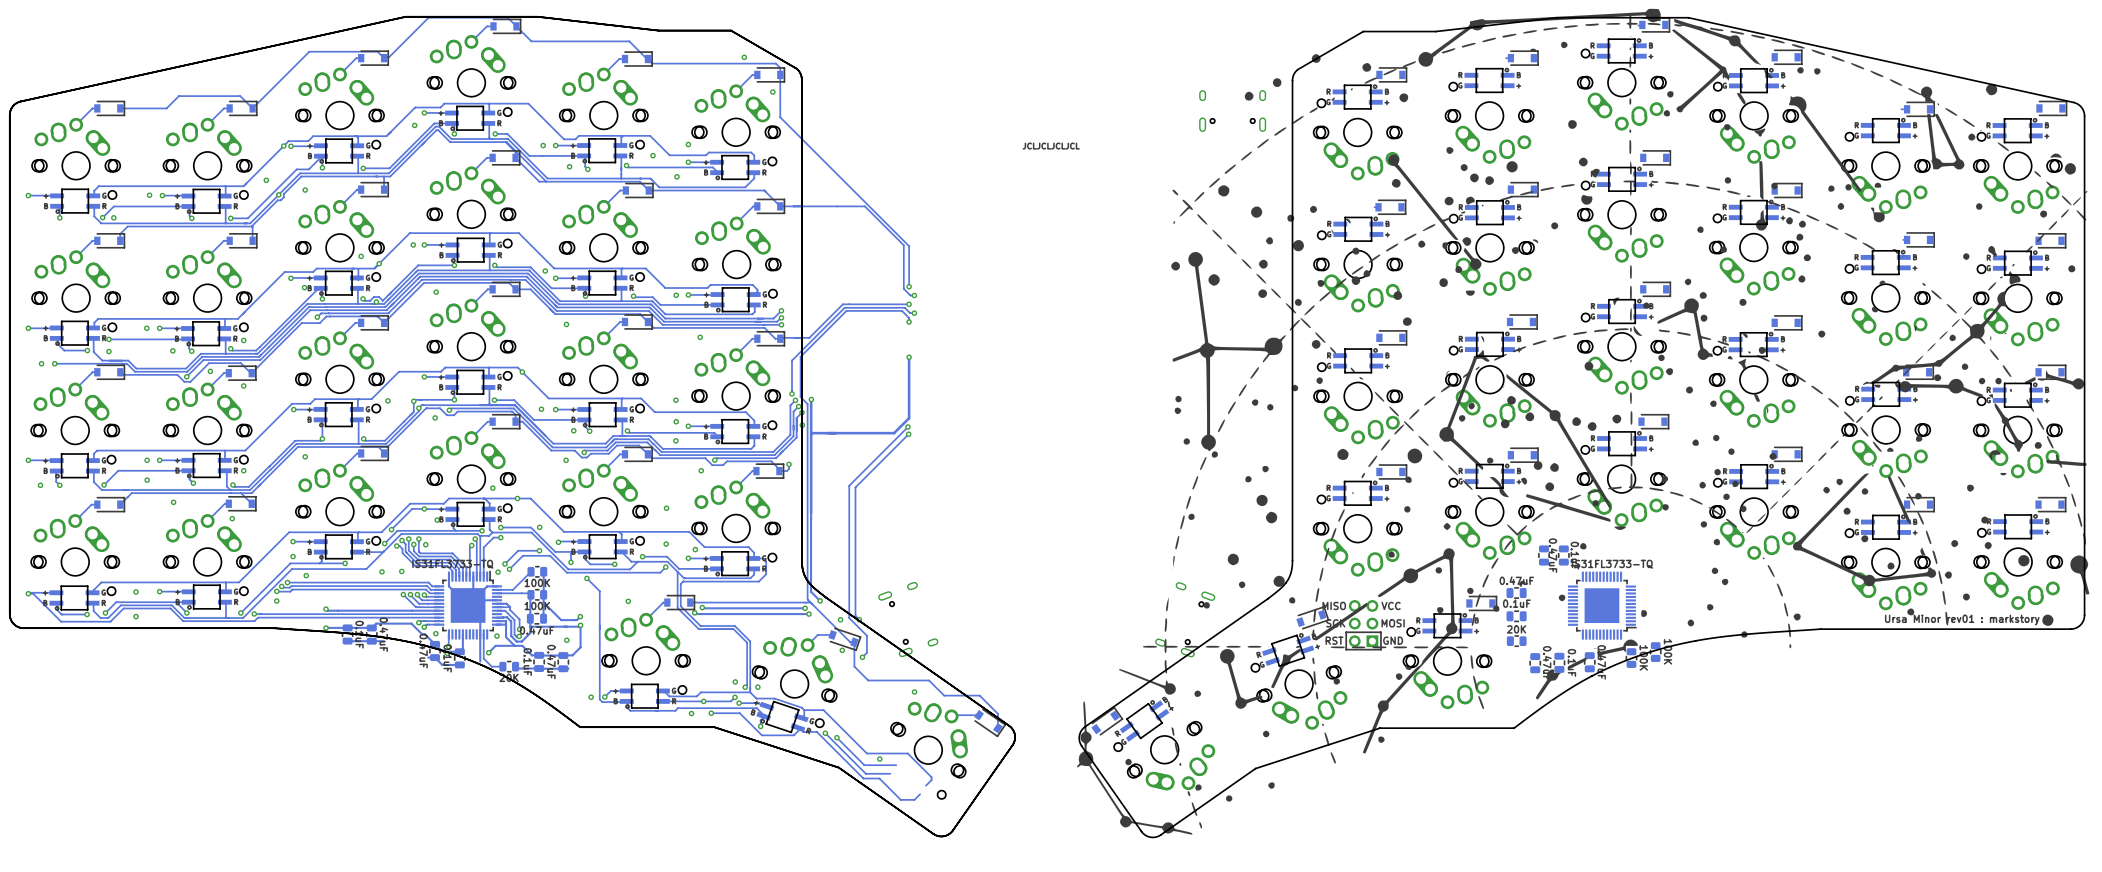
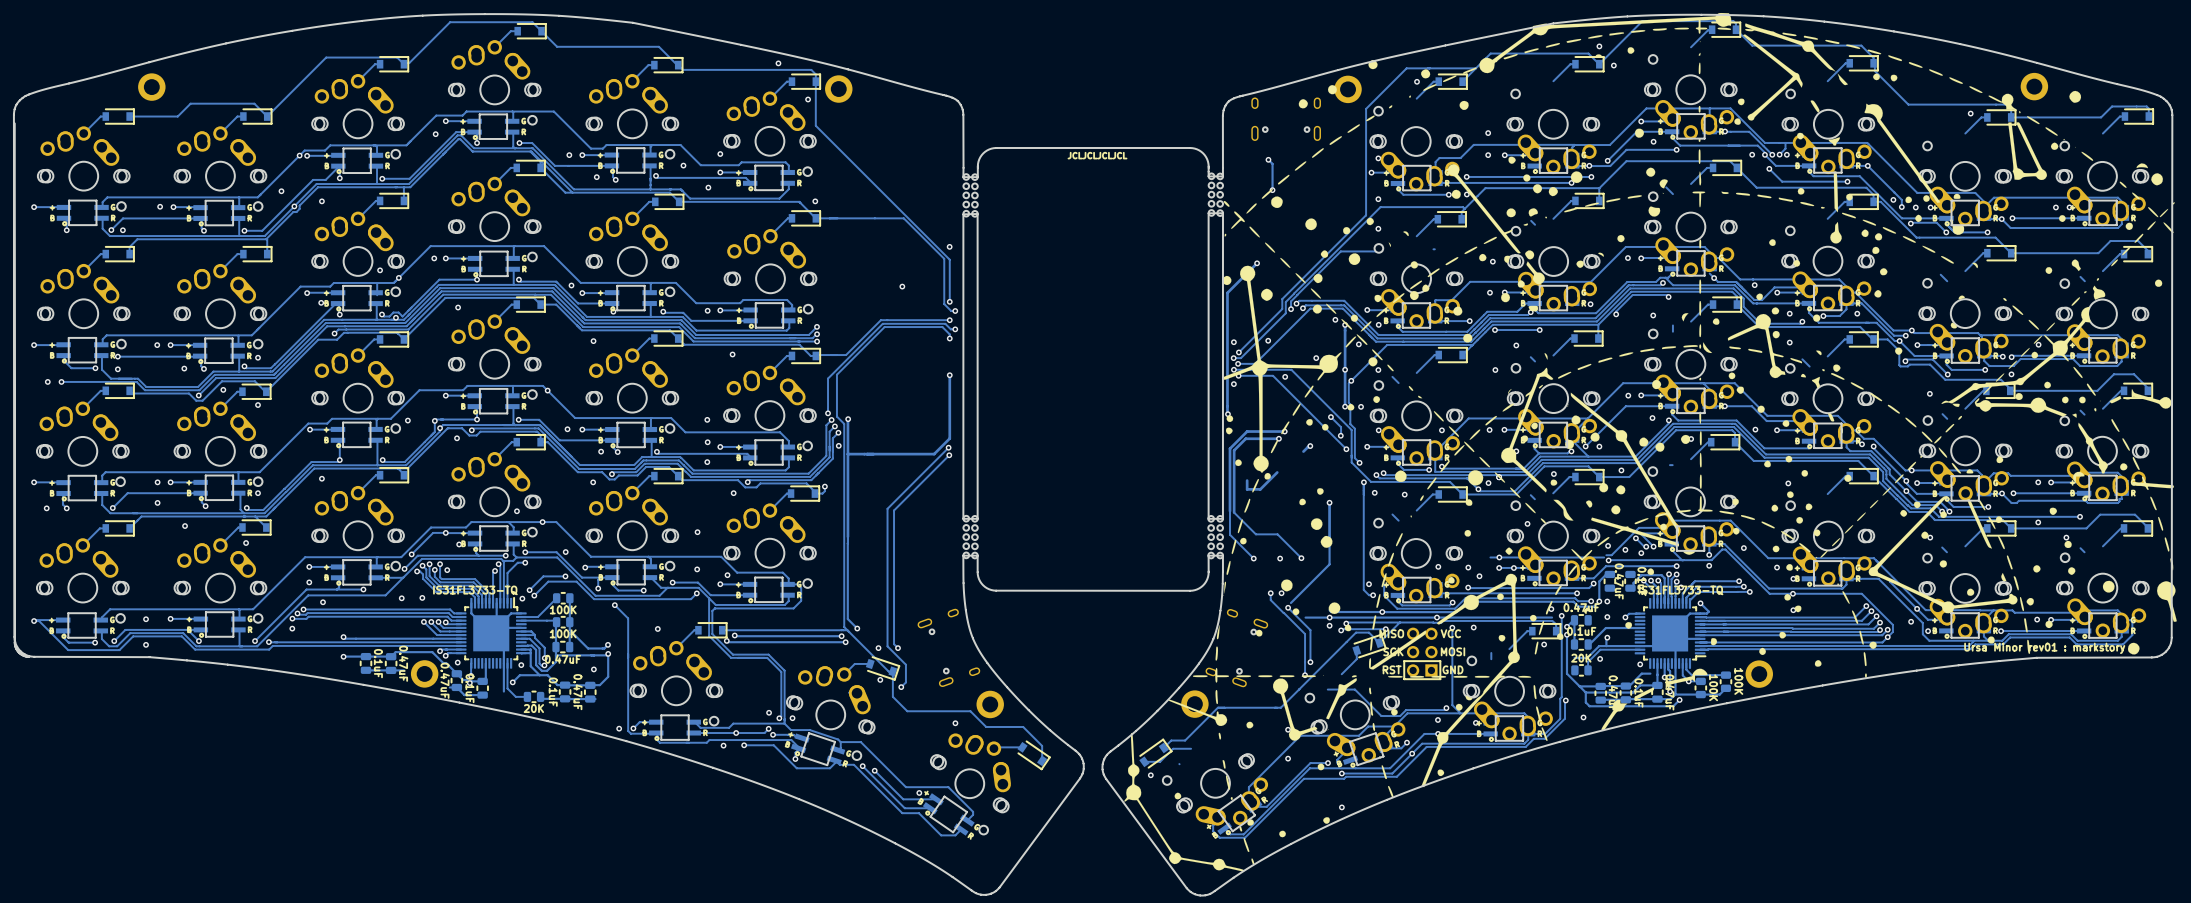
board edge: none -> (484, 14) (558, 15) (632, 22) (808, 59) (949, 96) (958, 101) (962, 111) (963, 177) (977, 177) (980, 157) (987, 150) (996, 147) (1192, 148) (1201, 151) (1206, 157) (1208, 176) (1222, 176) (1223, 111) (1227, 102) (1234, 98) (1351, 66) (1438, 46) (1553, 23) (1622, 16) (1751, 15) (1863, 26) (1979, 48) (2157, 95) (2168, 103) (2172, 115) (2170, 644) (2163, 653) (2154, 657) (2036, 657) (1955, 665) (1881, 675) (1710, 706) (1589, 733) (1478, 766) (1374, 804) (1287, 845) (1247, 868) (1211, 893) (1202, 895) (1193, 893) (1186, 888) (1106, 779) (1102, 766) (1107, 754) (1138, 728) (1164, 703) (1190, 674) (1207, 650) (1215, 633) (1219, 614) (1222, 555) (1208, 555) (1208, 574) (1206, 581) (1199, 588) (1190, 590) (993, 590) (984, 586) (979, 579) (977, 555) (963, 555) (966, 613) (971, 633) (978, 649) (995, 673) (1021, 703) (1047, 727) (1078, 753) (1083, 765) (1080, 778) (999, 887) (993, 892) (985, 894) (974, 892) (935, 865) (889, 840) (805, 801) (696, 762) (582, 729) (429, 696) (266, 669) (149, 657) (34, 656) (22, 653) (16, 646) (14, 636) (13, 114) (17, 103) (25, 95) (43, 89) (187, 52) (259, 36) (380, 18) (484, 14)
board edge: (1688, 17) (1556, 17) (1435, 31) (1363, 31) (1294, 73) (1292, 80) (1291, 569) (1285, 583) (1268, 598) (1081, 730) (1079, 737) (1081, 746) (1145, 835) (1152, 837) (1159, 835) (1255, 768) (1379, 728) (1514, 728) (1561, 694) (1598, 672) (1641, 654) (1681, 643) (1733, 635) (1820, 629) (2070, 629) (2077, 627) (2082, 622) (2084, 615) (2084, 116) (2082, 108) (2073, 102) (1688, 17) -> none
track: none -> (1735, 29) (1735, 23) (1733, 21) (1642, 21) (1599, 64)
track: none -> (1707, 30) (1691, 47)
track: none -> (1737, 30) (1752, 45) (1861, 45) (1873, 57) (1873, 63)
via: none -> (1599, 46)
part: (1621, 50) -> none
track: none -> (1847, 63) (1827, 81)
track: none -> (1570, 64) (1553, 81)
track: none -> (1599, 64) (1588, 53) (1490, 53) (1462, 81)
track: none -> (1874, 64) (1874, 71) (1908, 104) (2006, 104) (2011, 109) (2011, 117) (2101, 117) (2112, 106) (2146, 106) (2148, 108) (2148, 116)
via: none -> (1613, 65)
track: none -> (1475, 68) (1406, 68) (1366, 108) (1366, 215) (1282, 299) (1282, 309) (1238, 352)
board edge: (796, 68) (731, 30) (658, 30) (537, 16) (405, 16) (20, 101) -> none
board edge: (796, 68) (801, 79) -> none
board edge: (796, 68) (801, 79) -> none
track: none -> (1438, 81) (1433, 81) (1416, 98)
via: none -> (1417, 81)
board edge: (801, 79) (801, 559) -> none
part: none -> (2034, 86)
part: none -> (151, 87)
part: (1489, 80) -> none
part: (1753, 80) -> none
part: none -> (838, 89)
part: none -> (1348, 89)
part: (1357, 97) -> none
track: none -> (1709, 108) (1709, 120)
board edge: (20, 101) (12, 106) (9, 115) (10, 110) (12, 106) (16, 103) (20, 101) -> none
via: none -> (1970, 113)
track: none -> (2123, 116) (2119, 116) (2102, 133)
track: none -> (1981, 117) (1965, 133)
track: none -> (1672, 120) (1641, 121)
via: none -> (1641, 121)
part: none -> (1690, 126)
via: none -> (1725, 131)
track: none -> (1709, 131) (1749, 131) (1772, 154)
via: none -> (1488, 133)
part: (1885, 130) -> none
part: (2017, 130) -> none
via: none -> (1653, 141)
track: none -> (1785, 142) (1785, 148) (1779, 154)
track: none -> (1574, 145) (1609, 145) (1646, 108) (1730, 108) (1765, 142) (1867, 142) (1917, 192) (1975, 192) (1984, 201) (1984, 207)
track: none -> (1676, 149) (1626, 149) (1610, 166) (1572, 166)
via: none -> (1676, 149)
via: none -> (1488, 155)
via: none -> (1504, 155)
track: none -> (1534, 155) (1504, 155)
track: none -> (1572, 155) (1572, 147) (1574, 144) (1473, 144) (1460, 158) (1439, 158) (1435, 161) (1435, 172)
via: none -> (1752, 154)
via: none -> (1764, 154)
via: none -> (1772, 154)
via: none -> (1779, 154)
via: none -> (1786, 154)
via: none -> (1378, 158)
via: none -> (1268, 159)
track: none -> (1268, 159) (1272, 163) (1272, 190)
part: none -> (1553, 160)
part: none -> (1827, 160)
track: none -> (1607, 160) (1636, 131) (1672, 131) (1672, 137) (1680, 145) (1757, 145) (1775, 165) (1809, 165) (1809, 171) (1813, 176) (1859, 176) (1901, 218) (1946, 218) (1946, 224) (1954, 232) (1987, 232)
via: none -> (1607, 160)
via: none -> (1589, 165)
track: none -> (1846, 165) (1867, 165) (1901, 199) (1901, 207)
via: none -> (1867, 165)
track: none -> (1713, 167) (1707, 167) (1691, 183)
track: none -> (1769, 168) (1782, 181) (1847, 181)
via: none -> (1769, 168)
via: none -> (1371, 172)
track: none -> (1398, 172) (1371, 172)
via: none -> (1466, 176)
track: none -> (1591, 176) (1466, 176)
via: none -> (1591, 176)
part: none -> (1416, 178)
via: none -> (1847, 181)
track: none -> (1398, 183) (1398, 189) (1403, 194) (1448, 194)
track: none -> (1571, 182) (1435, 183)
via: none -> (1571, 182)
track: none -> (1666, 187) (1672, 194)
track: none -> (1599, 188) (1599, 200)
via: none -> (1272, 190)
part: (1622, 179) -> none
part: none -> (1211, 194)
part: none -> (1220, 194)
via: none -> (1448, 194)
via: none -> (1466, 194)
part: none -> (966, 195)
part: none -> (974, 195)
via: none -> (1378, 199)
via: none -> (1893, 199)
track: none -> (1575, 200) (1571, 200) (1553, 218)
via: none -> (815, 201)
track: none -> (1849, 201) (1844, 201) (1827, 218)
via: none -> (1901, 207)
via: none -> (1915, 207)
via: none -> (1930, 207)
via: none -> (2055, 207)
via: none -> (2069, 207)
track: none -> (2121, 207) (2125, 207) (2125, 204) (2118, 197) (1993, 197) (1984, 207)
track: none -> (1464, 208) (1462, 207) (1380, 207) (1285, 302) (1285, 313) (1240, 358) (1233, 358)
board edge: none -> (1222, 213) (1208, 213) (1208, 518) (1222, 518) (1222, 213)
part: none -> (1965, 213)
part: none -> (2103, 212)
board edge: none -> (977, 213) (963, 214) (963, 518) (977, 518) (977, 213)
via: none -> (2012, 218)
track: none -> (2084, 218) (2012, 218)
track: none -> (2121, 218) (2121, 224) (2118, 228) (2010, 228) (2001, 219) (1984, 218)
track: none -> (1433, 219) (1416, 236)
track: none -> (1461, 219) (1461, 211) (1485, 188) (1599, 188) (1626, 161) (1730, 161) (1756, 187) (1866, 187) (1873, 194) (1873, 201) (1880, 201) (1916, 237) (1995, 237) (2011, 253) (2098, 253) (2110, 241) (2138, 241) (2147, 250) (2147, 254)
via: none -> (2001, 219)
track: none -> (1531, 220) (1535, 224)
track: none -> (1910, 223) (1936, 222) (1946, 232)
via: none -> (1910, 223)
part: (1489, 212) -> none
part: (1753, 212) -> none
via: none -> (1378, 228)
via: none -> (1946, 232)
via: none -> (1987, 232)
part: (1358, 229) -> none
via: none -> (949, 246)
track: none -> (1380, 251) (1340, 251) (1291, 301) (1291, 309)
track: none -> (1983, 253) (1965, 271)
track: none -> (2124, 254) (2119, 254) (2102, 271)
via: none -> (1627, 258)
via: none -> (1641, 258)
track: none -> (1672, 257) (1641, 258)
via: none -> (1492, 261)
track: none -> (1257, 263) (1227, 292) (1227, 414)
via: none -> (1257, 263)
part: none -> (1690, 263)
track: none -> (1672, 273) (1668, 277) (1660, 277) (1656, 281) (1627, 281) (1596, 313) (1538, 313) (1534, 303)
track: none -> (1709, 273) (1718, 281) (1736, 281) (1754, 299) (1762, 300) (1774, 287) (1804, 287) (1807, 284)
track: none -> (1940, 274) (1947, 281)
part: (1885, 262) -> none
track: none -> (2080, 276) (2084, 281)
track: none -> (1665, 277) (1673, 285) (1734, 285) (1753, 303) (1808, 303) (1808, 312) (1818, 322) (1876, 322) (1894, 340) (1899, 340) (1914, 355) (1946, 355) (1946, 364) (1951, 369) (1985, 369)
via: none -> (1714, 278)
part: (2017, 263) -> none
track: none -> (1662, 282) (1660, 285) (1628, 285) (1595, 318) (1490, 318) (1469, 338) (1377, 338) (1344, 305) (1305, 305) (1302, 308)
via: none -> (1662, 282)
via: none -> (1754, 285)
via: none -> (902, 286)
via: none -> (1489, 292)
track: none -> (1504, 292) (1534, 292)
via: none -> (1504, 292)
via: none -> (1777, 292)
track: none -> (1808, 292) (1779, 292)
track: none -> (1668, 296) (1667, 294) (1632, 294) (1616, 311) (1616, 314)
via: none -> (1668, 296)
part: none -> (1553, 298)
part: none -> (1827, 298)
track: none -> (1296, 303) (1299, 300) (1344, 300) (1378, 335) (1468, 335) (1488, 315) (1527, 315) (1530, 312)
via: none -> (1296, 303)
track: none -> (1534, 303) (1525, 303) (1517, 311) (1487, 311) (1467, 331) (1446, 331)
via: none -> (1590, 304)
track: none -> (1713, 304) (1708, 304) (1691, 321)
via: none -> (1302, 308)
via: none -> (1291, 309)
track: none -> (1367, 310) (1397, 310)
via: none -> (1367, 310)
track: none -> (1435, 310) (1435, 300) (1451, 300) (1470, 281) (1591, 281) (1625, 246) (1704, 246) (1709, 252) (1709, 257) (1718, 257) (1740, 279) (1839, 279) (1846, 286) (1846, 292) (1855, 292) (1893, 330) (1911, 330) (1914, 333) (1978, 333) (1982, 337) (1982, 344) (1984, 345)
via: none -> (1530, 312)
via: none -> (1616, 314)
via: none -> (1789, 313)
via: none -> (1857, 313)
part: none -> (1416, 315)
via: none -> (1653, 315)
track: none -> (1823, 316) (1839, 316) (1846, 309) (1846, 303) (1861, 303) (1894, 335) (1905, 335)
via: none -> (1823, 316)
via: none -> (1335, 319)
track: none -> (1397, 320) (1397, 326) (1402, 331) (1446, 331)
track: none -> (1435, 320) (1469, 321)
via: none -> (1469, 321)
track: none -> (1802, 321) (1800, 323) (1760, 323) (1743, 306) (1743, 298) (1733, 288) (1630, 288) (1597, 321) (1491, 321) (1471, 341) (1376, 341) (1342, 308) (1310, 308) (1255, 363) (1238, 363) (1239, 364)
via: none -> (1802, 321)
track: none -> (1345, 324) (1345, 406)
via: none -> (1345, 324)
via: none -> (1378, 324)
track: none -> (1598, 324) (1598, 338)
track: none -> (1598, 324) (1492, 324) (1462, 355)
track: none -> (1598, 324) (1631, 291) (1732, 291) (1736, 296) (1736, 304) (1759, 326) (1860, 326) (1872, 339)
track: none -> (1672, 325) (1672, 331)
part: (1622, 311) -> none
via: none -> (1494, 330)
track: none -> (1539, 330) (1495, 330)
via: none -> (1539, 330)
via: none -> (1911, 330)
track: none -> (1980, 335) (2117, 335) (2121, 339) (2121, 344)
via: none -> (1905, 335)
track: none -> (1574, 338) (1570, 338) (1553, 355)
track: none -> (1849, 339) (1844, 339) (1827, 356)
track: none -> (1873, 339) (1887, 339) (1899, 351) (1900, 366) (1930, 364) (1945, 379) (2001, 379) (2010, 388)
via: none -> (1268, 340)
via: none -> (1899, 340)
via: none -> (1233, 342)
via: none -> (1789, 342)
via: none -> (1358, 344)
via: none -> (2038, 344)
track: none -> (1472, 345) (1387, 344) (1348, 383) (1350, 424) (1354, 428) (1354, 458) (1359, 462)
via: none -> (1516, 345)
via: none -> (1917, 345)
track: none -> (1946, 345) (1917, 345)
part: none -> (1965, 350)
part: none -> (2102, 350)
via: none -> (1238, 352)
track: none -> (1438, 355) (1434, 355) (1416, 372)
track: none -> (2084, 355) (2011, 357)
track: none -> (2121, 355) (2121, 361) (2117, 366) (2080, 366) (2073, 359) (2020, 359) (2013, 366) (1989, 366) (1984, 360) (1984, 355) (2002, 356)
track: none -> (1530, 357) (1535, 361)
via: none -> (2002, 356)
via: none -> (2011, 357)
via: none -> (1233, 358)
via: none -> (1316, 358)
track: none -> (1802, 359) (1809, 366)
via: none -> (1905, 361)
part: (1489, 344) -> none
part: (1753, 344) -> none
track: none -> (1906, 362) (1907, 359) (1932, 359) (1947, 374)
via: none -> (1238, 363)
track: none -> (1233, 369) (1291, 369) (1351, 430) (1351, 462) (1371, 481) (1449, 481) (1462, 494) (1516, 494) (1544, 466) (1588, 466) (1599, 477) (1629, 477) (1676, 430) (1732, 430) (1735, 433) (1735, 442) (1753, 460) (1858, 460) (1909, 511) (1926, 511) (1934, 520) (2002, 520) (2011, 528) (2086, 528) (2100, 514) (2135, 514) (2147, 527)
via: none -> (1233, 369)
via: none -> (1345, 369)
via: none -> (1378, 370)
via: none -> (1495, 370)
via: none -> (1985, 369)
via: none -> (1947, 374)
via: none -> (2011, 374)
track: none -> (1238, 375) (1273, 375) (1346, 449)
via: none -> (1238, 375)
via: none -> (1285, 376)
track: none -> (1392, 376) (1398, 383)
part: (1358, 360) -> none
via: none -> (1351, 380)
track: none -> (1703, 383) (1709, 389) (1709, 395)
via: none -> (1233, 384)
track: none -> (2147, 388) (2134, 374) (2113, 374) (2097, 390) (2010, 390)
track: none -> (1983, 390) (1965, 408)
track: none -> (2120, 390) (2102, 408)
via: none -> (1929, 393)
via: none -> (1628, 395)
via: none -> (1641, 395)
track: none -> (1672, 395) (1641, 395)
part: none -> (1690, 400)
via: none -> (1345, 406)
via: none -> (1361, 406)
track: none -> (1709, 406) (1751, 406) (1766, 421) (1809, 421)
via: none -> (1724, 406)
track: none -> (2080, 410) (2084, 414)
via: none -> (1227, 414)
track: none -> (1942, 414) (1947, 418)
part: (1886, 394) -> none
part: (2017, 395) -> none
track: none -> (1330, 417) (1341, 427) (1340, 435)
via: none -> (1330, 417)
track: none -> (1587, 418) (1468, 418) (1440, 447) (1435, 447)
via: none -> (1652, 418)
track: none -> (1668, 420) (1668, 423) (1635, 456) (1540, 456) (1525, 471) (1435, 471) (1435, 457)
via: none -> (1668, 420)
via: none -> (1489, 429)
via: none -> (1504, 429)
track: none -> (1534, 429) (1504, 429)
track: none -> (1572, 429) (1576, 429) (1623, 383) (1734, 383) (1767, 415) (1837, 415) (1846, 424) (1846, 430) (1855, 430) (1864, 438) (1873, 438) (1905, 470) (1977, 470) (1981, 474) (1982, 483) (1993, 473) (2008, 473) (2010, 475) (2072, 475) (2075, 472) (2117, 472) (2121, 476) (2121, 482)
via: none -> (1755, 429)
via: none -> (1378, 430)
via: none -> (1441, 430)
track: none -> (1777, 430) (1809, 430)
via: none -> (1777, 430)
via: none -> (1284, 431)
track: none -> (1286, 431) (1247, 431) (1229, 448) (1229, 534) (1253, 558)
part: none -> (1553, 435)
via: none -> (1340, 435)
part: none -> (1827, 435)
track: none -> (1278, 438) (1245, 438) (1234, 450) (1234, 512) (1255, 534) (1277, 534) (1301, 558)
via: none -> (1278, 438)
via: none -> (1691, 439)
track: none -> (1534, 440) (1534, 448) (1539, 453)
track: none -> (1572, 440) (1588, 456)
track: none -> (1809, 441) (1808, 448) (1764, 448) (1736, 420) (1678, 420) (1672, 414) (1672, 406) (1625, 406) (1585, 446)
track: none -> (1708, 442) (1691, 459)
track: none -> (1862, 444) (1858, 441) (1846, 441) (1846, 447) (1850, 451) (1871, 451) (1889, 469) (1889, 474) (1917, 501) (1940, 501) (1949, 511)
via: none -> (1862, 444)
track: none -> (1310, 444) (1303, 451)
via: none -> (1310, 446)
via: none -> (1585, 446)
via: none -> (1599, 446)
via: none -> (1873, 446)
track: none -> (1367, 446) (1397, 447)
via: none -> (1367, 446)
track: none -> (1873, 448) (1916, 493) (1946, 493) (1946, 499) (1953, 506) (1988, 506)
via: none -> (1346, 449)
via: none -> (1516, 451)
track: none -> (1571, 451) (1567, 453) (1539, 453)
via: none -> (1571, 451)
part: none -> (1416, 452)
track: none -> (1539, 453) (1523, 468) (1443, 468) (1441, 466)
track: none -> (1397, 457) (1397, 463) (1403, 469) (1429, 469)
via: none -> (1359, 462)
track: none -> (1672, 465) (1669, 465)
part: (1622, 443) -> none
via: none -> (1441, 466)
via: none -> (1429, 469)
via: none -> (1621, 470)
via: none -> (1911, 470)
track: none -> (1277, 472) (1260, 489) (1247, 489) (1247, 480)
via: none -> (1383, 473)
via: none -> (1553, 474)
track: none -> (1376, 475) (1379, 478) (1467, 478) (1480, 491) (1514, 491) (1543, 463) (1638, 463) (1674, 427) (1733, 427) (1764, 457) (1868, 457) (1883, 472) (1883, 481) (1911, 508) (1930, 508) (1939, 516) (2080, 516)
via: none -> (1376, 475)
track: none -> (1384, 475) (1526, 475) (1541, 459) (1636, 459) (1673, 423) (1735, 423) (1765, 454) (1870, 454) (1886, 470) (1886, 478) (1912, 505) (1935, 505) (1942, 511)
track: none -> (1849, 476) (1845, 476) (1827, 494)
via: none -> (1499, 477)
track: none -> (1575, 477) (1569, 477) (1553, 493)
via: none -> (1906, 481)
track: none -> (1363, 482) (1363, 589) (1369, 595) (1373, 595)
via: none -> (1363, 482)
track: none -> (1946, 483) (1917, 483)
via: none -> (2038, 482)
via: none -> (2051, 482)
track: none -> (2084, 482) (2051, 482)
via: none -> (1488, 483)
via: none -> (1788, 483)
via: none -> (1917, 483)
part: none -> (2102, 487)
via: none -> (1478, 489)
part: none -> (1965, 488)
via: none -> (1906, 491)
via: none -> (1374, 492)
via: none -> (2013, 493)
track: none -> (2084, 493) (2013, 493)
track: none -> (2121, 493) (2121, 499) (2119, 498) (2117, 503) (2088, 503) (2086, 500) (2018, 500) (2016, 503) (2011, 503) (2002, 493) (1984, 493)
track: none -> (1438, 494) (1432, 494) (1416, 510)
via: none -> (2002, 493)
via: none -> (1404, 494)
track: none -> (1530, 495) (1534, 499)
part: (1489, 476) -> none
part: (1754, 476) -> none
track: none -> (1329, 502) (1329, 564) (1290, 602)
via: none -> (1329, 502)
via: none -> (1988, 506)
via: none -> (1942, 511)
via: none -> (1949, 511)
track: none -> (1392, 514) (1398, 520)
part: (1357, 493) -> none
via: none -> (2080, 516)
via: none -> (2038, 522)
via: none -> (1527, 523)
track: none -> (1987, 528) (1983, 528) (1965, 546)
track: none -> (2120, 528) (2102, 546)
track: none -> (1671, 533) (1641, 533) (1653, 546)
part: none -> (966, 537)
part: none -> (974, 537)
part: none -> (1211, 537)
part: none -> (1220, 537)
via: none -> (1930, 537)
via: none -> (2066, 537)
track: none -> (1635, 538) (1646, 546)
via: none -> (1635, 538)
part: none -> (1690, 538)
track: none -> (1671, 544) (1671, 549) (1682, 560)
via: none -> (1608, 545)
via: none -> (1646, 546)
via: none -> (1653, 546)
track: none -> (1942, 547) (1946, 552)
via: none -> (1743, 548)
track: none -> (2080, 548) (2084, 552)
via: none -> (1625, 549)
part: (2018, 526) -> none
part: (1885, 527) -> none
via: none -> (1641, 553)
track: none -> (1606, 555) (1611, 555) (1638, 527) (1661, 527) (1669, 520) (1730, 520) (1768, 558) (1873, 558) (1879, 563)
track: none -> (1709, 554) (1709, 544) (1724, 544) (1769, 588) (1842, 588) (1846, 584) (1846, 578) (1878, 578) (1922, 623) (1922, 634) (1929, 640) (2002, 640) (2008, 634) (2071, 634) (2077, 640) (2117, 640) (2121, 636) (2121, 630)
via: none -> (1709, 554)
via: none -> (1499, 557)
track: none -> (1604, 557) (1490, 557)
via: none -> (1253, 558)
via: none -> (1280, 558)
via: none -> (1301, 558)
track: none -> (1608, 560) (1711, 560) (1722, 549) (1725, 549) (1769, 593) (1861, 593) (1892, 624) (1892, 631) (1882, 642) (1700, 642)
via: none -> (1608, 560)
track: none -> (1875, 560) (1925, 610) (2012, 610) (2014, 612) (2117, 610) (2121, 614) (2121, 620) (2132, 621) (2132, 635) (2123, 644) (2077, 644) (2069, 637) (2010, 637) (2003, 644) (1975, 644) (1970, 649) (1700, 649)
track: none -> (1676, 566) (1605, 566) (1593, 578) (1572, 578)
via: none -> (1676, 566)
via: none -> (1709, 565)
via: none -> (1438, 566)
via: none -> (1468, 567)
via: none -> (1499, 567)
via: none -> (1513, 568)
track: none -> (1534, 567) (1499, 567)
via: none -> (1777, 567)
part: none -> (1553, 573)
part: none -> (1827, 573)
track: none -> (1669, 574) (1668, 603)
via: none -> (1669, 574)
track: none -> (1676, 574) (1671, 579) (1671, 603)
via: none -> (1676, 574)
track: none -> (1611, 575) (1605, 575) (1599, 581) (1599, 601) (1594, 606) (1578, 606) (1573, 601) (1466, 601) (1456, 612) (1331, 612) (1329, 610)
via: none -> (1479, 576)
via: none -> (1793, 578)
track: none -> (1643, 580) (1653, 591) (1653, 603)
via: none -> (1643, 580)
track: none -> (1651, 580) (1657, 587) (1657, 603)
via: none -> (1651, 580)
track: none -> (1658, 580) (1661, 583) (1661, 603)
via: none -> (1658, 580)
track: none -> (1676, 581) (1675, 603)
via: none -> (1676, 581)
track: none -> (1739, 581) (1695, 581) (1682, 593) (1682, 603)
via: none -> (1739, 581)
track: none -> (1890, 582) (1927, 619) (1946, 620)
track: none -> (1593, 583) (1589, 588) (1468, 587)
via: none -> (1593, 583)
via: none -> (1369, 584)
track: none -> (1384, 584) (1384, 595) (1397, 608) (1455, 608) (1465, 598) (1575, 598) (1578, 601) (1591, 601)
board edge: (801, 559) (803, 572) (808, 581) -> none
board edge: (801, 559) (803, 572) (808, 581) -> none
track: none -> (1743, 586) (1697, 586) (1686, 597) (1686, 603)
via: none -> (1743, 586)
via: none -> (1468, 587)
via: none -> (1681, 587)
part: none -> (1416, 590)
track: none -> (1633, 590) (1633, 582) (1641, 575) (1661, 575) (1664, 578) (1664, 603)
track: none -> (1737, 592) (1698, 592) (1689, 600) (1689, 603)
track: none -> (1749, 591) (1737, 591)
via: none -> (1749, 591)
track: none -> (1270, 593) (1270, 600) (1305, 634) (1305, 675)
via: none -> (1270, 593)
via: none -> (1281, 593)
track: none -> (1577, 593) (1437, 593) (1435, 595)
via: none -> (1577, 593)
via: none -> (1792, 593)
via: none -> (1373, 595)
track: none -> (1397, 595) (1397, 601) (1402, 605) (1449, 605) (1452, 602)
via: none -> (1591, 601)
via: none -> (1599, 601)
via: none -> (1607, 601)
via: none -> (1452, 602)
track: none -> (1700, 603) (1708, 611) (1706, 613) (1689, 613) (1657, 646) (1599, 646) (1587, 657) (1574, 657)
via: none -> (1700, 603)
track: none -> (1866, 606) (1854, 617) (1700, 617)
via: none -> (1866, 606)
track: none -> (1288, 607) (1310, 630) (1310, 662)
via: none -> (1288, 607)
board edge: (808, 581) (826, 597) -> none
board edge: (808, 581) (826, 597) -> none
via: none -> (1551, 609)
via: none -> (1917, 608)
via: none -> (1793, 610)
track: none -> (1993, 610) (1983, 620)
track: none -> (1871, 611) (1861, 620) (1700, 620)
via: none -> (1871, 611)
via: none -> (1382, 612)
track: none -> (1640, 613) (1629, 613) (1625, 617)
track: none -> (1561, 615) (1560, 718) (1545, 733) (1528, 733) (1528, 739) (1524, 743) (1422, 743) (1392, 773) (1341, 773)
via: none -> (1561, 615)
via: none -> (1607, 617)
track: none -> (1876, 616) (1868, 624) (1700, 624)
via: none -> (1876, 616)
via: none -> (1329, 617)
via: none -> (1436, 617)
track: none -> (1552, 617) (1305, 617)
via: none -> (1625, 617)
via: none -> (2037, 619)
track: none -> (2051, 619) (2084, 620)
via: none -> (2051, 619)
via: none -> (1911, 621)
track: none -> (1399, 622) (1379, 642) (1369, 632) (1356, 632) (1280, 707) (1217, 707) (1185, 740) (1171, 740) (1163, 747)
track: none -> (1880, 622) (1873, 628) (1700, 628)
via: none -> (1880, 622)
track: none -> (1346, 623) (1552, 620) (1556, 624) (1556, 631)
via: none -> (1346, 623)
board edge: (826, 597) (1009, 725) -> none
via: none -> (1329, 625)
part: none -> (1965, 625)
part: none -> (2102, 625)
via: none -> (1473, 627)
track: none -> (1566, 626) (1574, 619) (1574, 645)
via: none -> (1566, 626)
track: none -> (1452, 627) (1452, 705) (1459, 713)
via: none -> (1452, 627)
track: none -> (1640, 628) (1605, 628) (1588, 645)
track: none -> (1385, 629) (1341, 630)
via: none -> (1385, 629)
via: none -> (1341, 630)
track: none -> (1880, 630) (1878, 632) (1700, 631)
via: none -> (1880, 630)
track: none -> (1887, 629) (1882, 635) (1700, 635)
via: none -> (1887, 629)
track: none -> (1532, 631) (1527, 631) (1509, 649)
via: none -> (1928, 631)
track: none -> (1983, 630) (1983, 636) (1988, 640)
via: none -> (2001, 631)
track: none -> (2084, 630) (2000, 630)
track: none -> (1566, 634) (1566, 673) (1585, 692)
via: none -> (1566, 634)
track: none -> (1607, 637) (1606, 646)
via: none -> (1607, 637)
via: none -> (1887, 637)
track: none -> (1700, 638) (1675, 638) (1675, 694) (1670, 699) (1600, 700)
track: none -> (1973, 640) (1969, 645) (1705, 646)
via: none -> (1544, 644)
track: none -> (1640, 649) (1600, 649) (1588, 662) (1588, 670)
track: none -> (1356, 650) (1356, 659) (1341, 674)
track: none -> (1491, 652) (1491, 659)
part: (1447, 625) -> none
board edge: (273, 628) (23, 628) -> none
board edge: (273, 628) (352, 633) (398, 639) -> none
board edge: (273, 628) (352, 633) (398, 639) -> none
via: none -> (1600, 658)
via: none -> (1310, 662)
track: none -> (1657, 663) (1656, 686)
track: none -> (1664, 663) (1664, 677)
track: none -> (1668, 663) (1670, 691)
track: none -> (1682, 663) (1682, 675) (1688, 681) (1700, 681)
track: none -> (1686, 663) (1686, 669) (1691, 675) (1725, 675)
via: none -> (1640, 664)
board edge: (398, 639) (452, 653) (502, 674) -> none
board edge: (398, 639) (452, 653) (502, 674) -> none
part: none -> (424, 673)
track: none -> (1650, 673) (1641, 673) (1629, 686) (1579, 686)
part: none -> (1759, 674)
via: none -> (1305, 675)
via: none -> (1664, 677)
part rotation: 0° (1288, 649) -> 180° (1366, 749)
part position: (1288, 649) -> (1366, 749)
via: none -> (1688, 681)
track: none -> (1657, 685) (1640, 685) (1632, 692) (1585, 692)
track: none -> (1725, 688) (1719, 694) (1675, 694)
track: none -> (1327, 689) (1354, 689) (1381, 716) (1400, 716) (1406, 710) (1444, 710) (1446, 708)
via: none -> (1670, 691)
track: none -> (1585, 692) (1585, 702) (1589, 706) (1673, 706) (1679, 699)
via: none -> (1679, 699)
track: none -> (1565, 700) (1565, 718) (1544, 738) (1533, 738) (1525, 746) (1426, 746) (1396, 776) (1303, 778) (1245, 837) (1219, 837) (1213, 831) (1213, 825) (1218, 819)
via: none -> (1565, 700)
part: none -> (990, 704)
part: none -> (1194, 704)
board edge: (502, 674) (537, 696) (580, 727) -> none
board edge: (502, 674) (537, 696) (580, 727) -> none
via: none -> (1446, 708)
via: none -> (1583, 717)
via: none -> (1437, 720)
via: none -> (1475, 722)
track: none -> (1528, 723) (1528, 717) (1524, 713) (1407, 713) (1382, 738)
track: none -> (1394, 726) (1368, 726) (1358, 735) (1300, 735) (1248, 787) (1248, 798)
part: none -> (1509, 728)
via: none -> (1288, 729)
via: none -> (1438, 733)
track: none -> (1490, 733) (1424, 733) (1390, 768) (1309, 768) (1243, 834) (1230, 834) (1224, 828)
track: none -> (1406, 742) (1401, 748) (1386, 748)
via: none -> (1406, 742)
track: none -> (1191, 748) (1173, 748) (1160, 761) (1144, 761)
track: none -> (1347, 750) (1337, 759) (1337, 763)
part rotation: 0° (1144, 721) -> 180° (1236, 813)
part position: (1144, 721) -> (1236, 813)
via: none -> (1412, 753)
board edge: (1009, 725) (1014, 734) (1012, 745) -> none
board edge: (1009, 725) (1014, 734) (1012, 745) -> none
via: none -> (1288, 758)
board edge: (580, 727) (714, 727) (838, 767) (933, 833) -> none
track: none -> (1328, 763) (1310, 763) (1266, 806) (1255, 806)
via: none -> (1328, 763)
track: none -> (1179, 764) (1179, 764)
via: none -> (1341, 773)
via: none -> (1150, 775)
board edge: (1012, 745) (952, 830) -> none
via: none -> (1341, 807)
part: none -> (948, 814)
board edge: (952, 830) (943, 836) (933, 833) -> none
board edge: (952, 830) (943, 836) (933, 833) -> none

